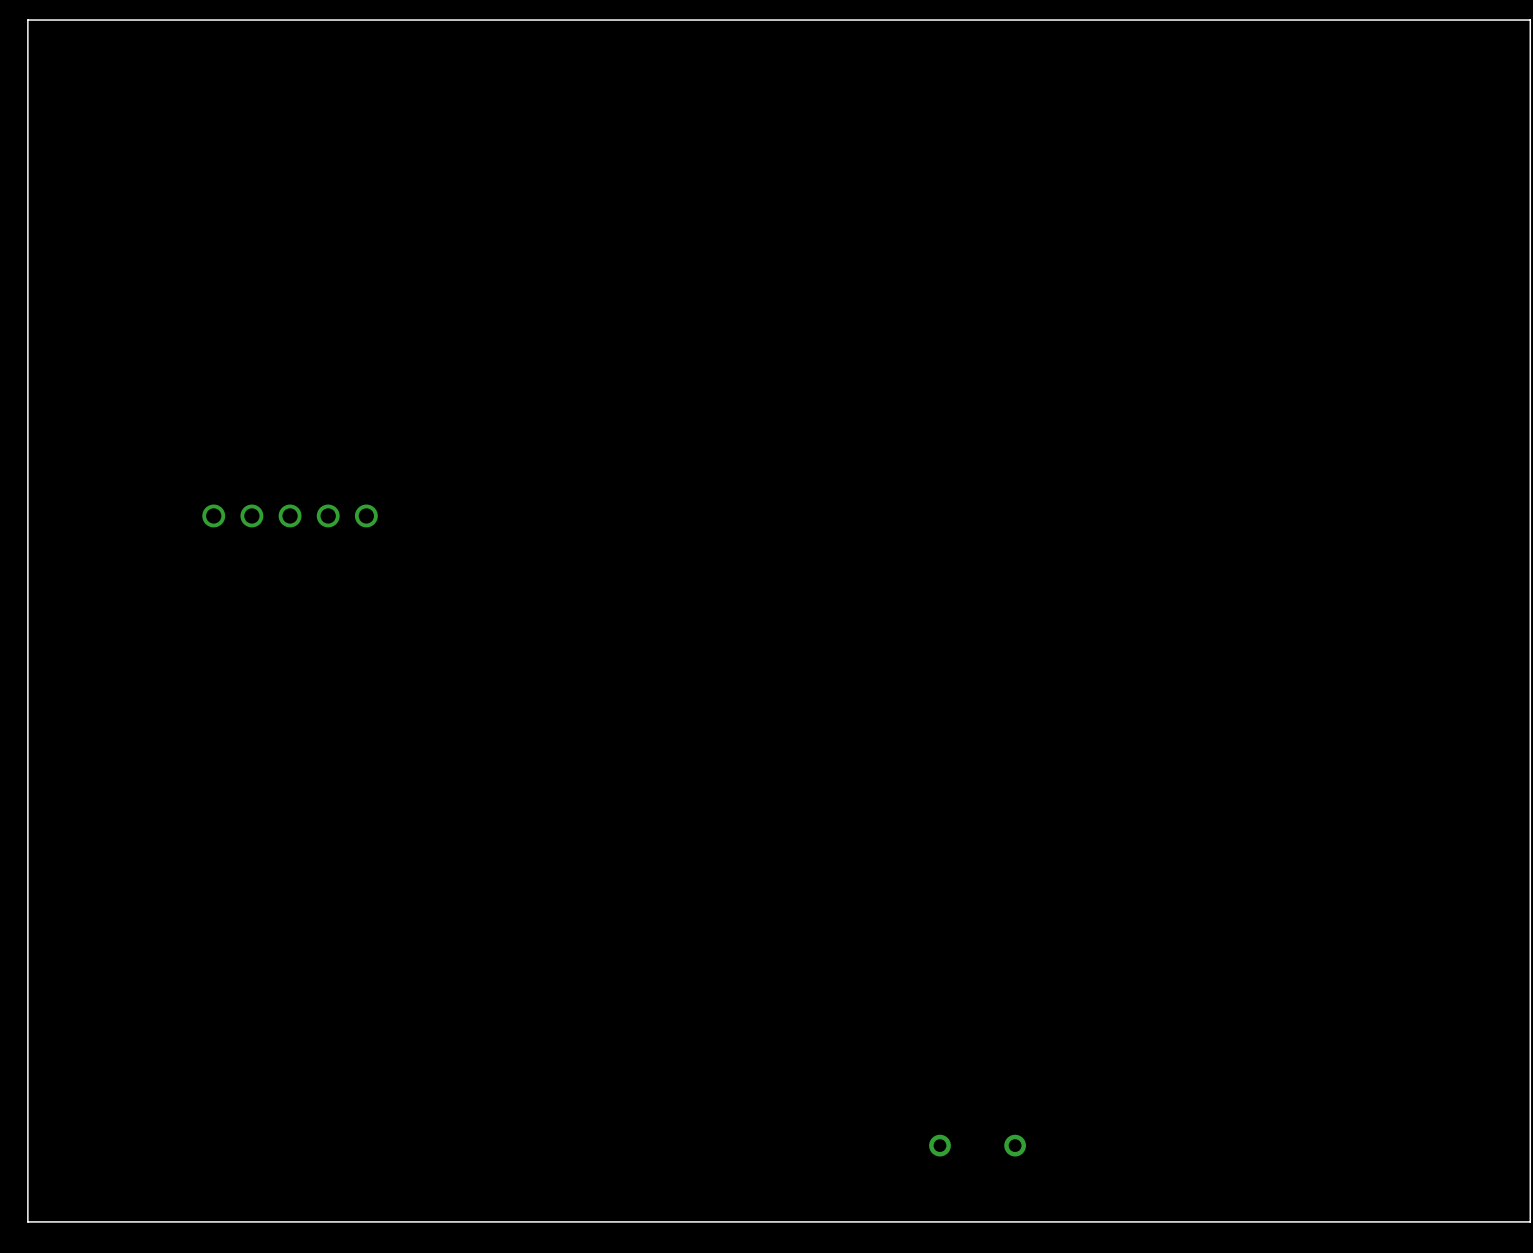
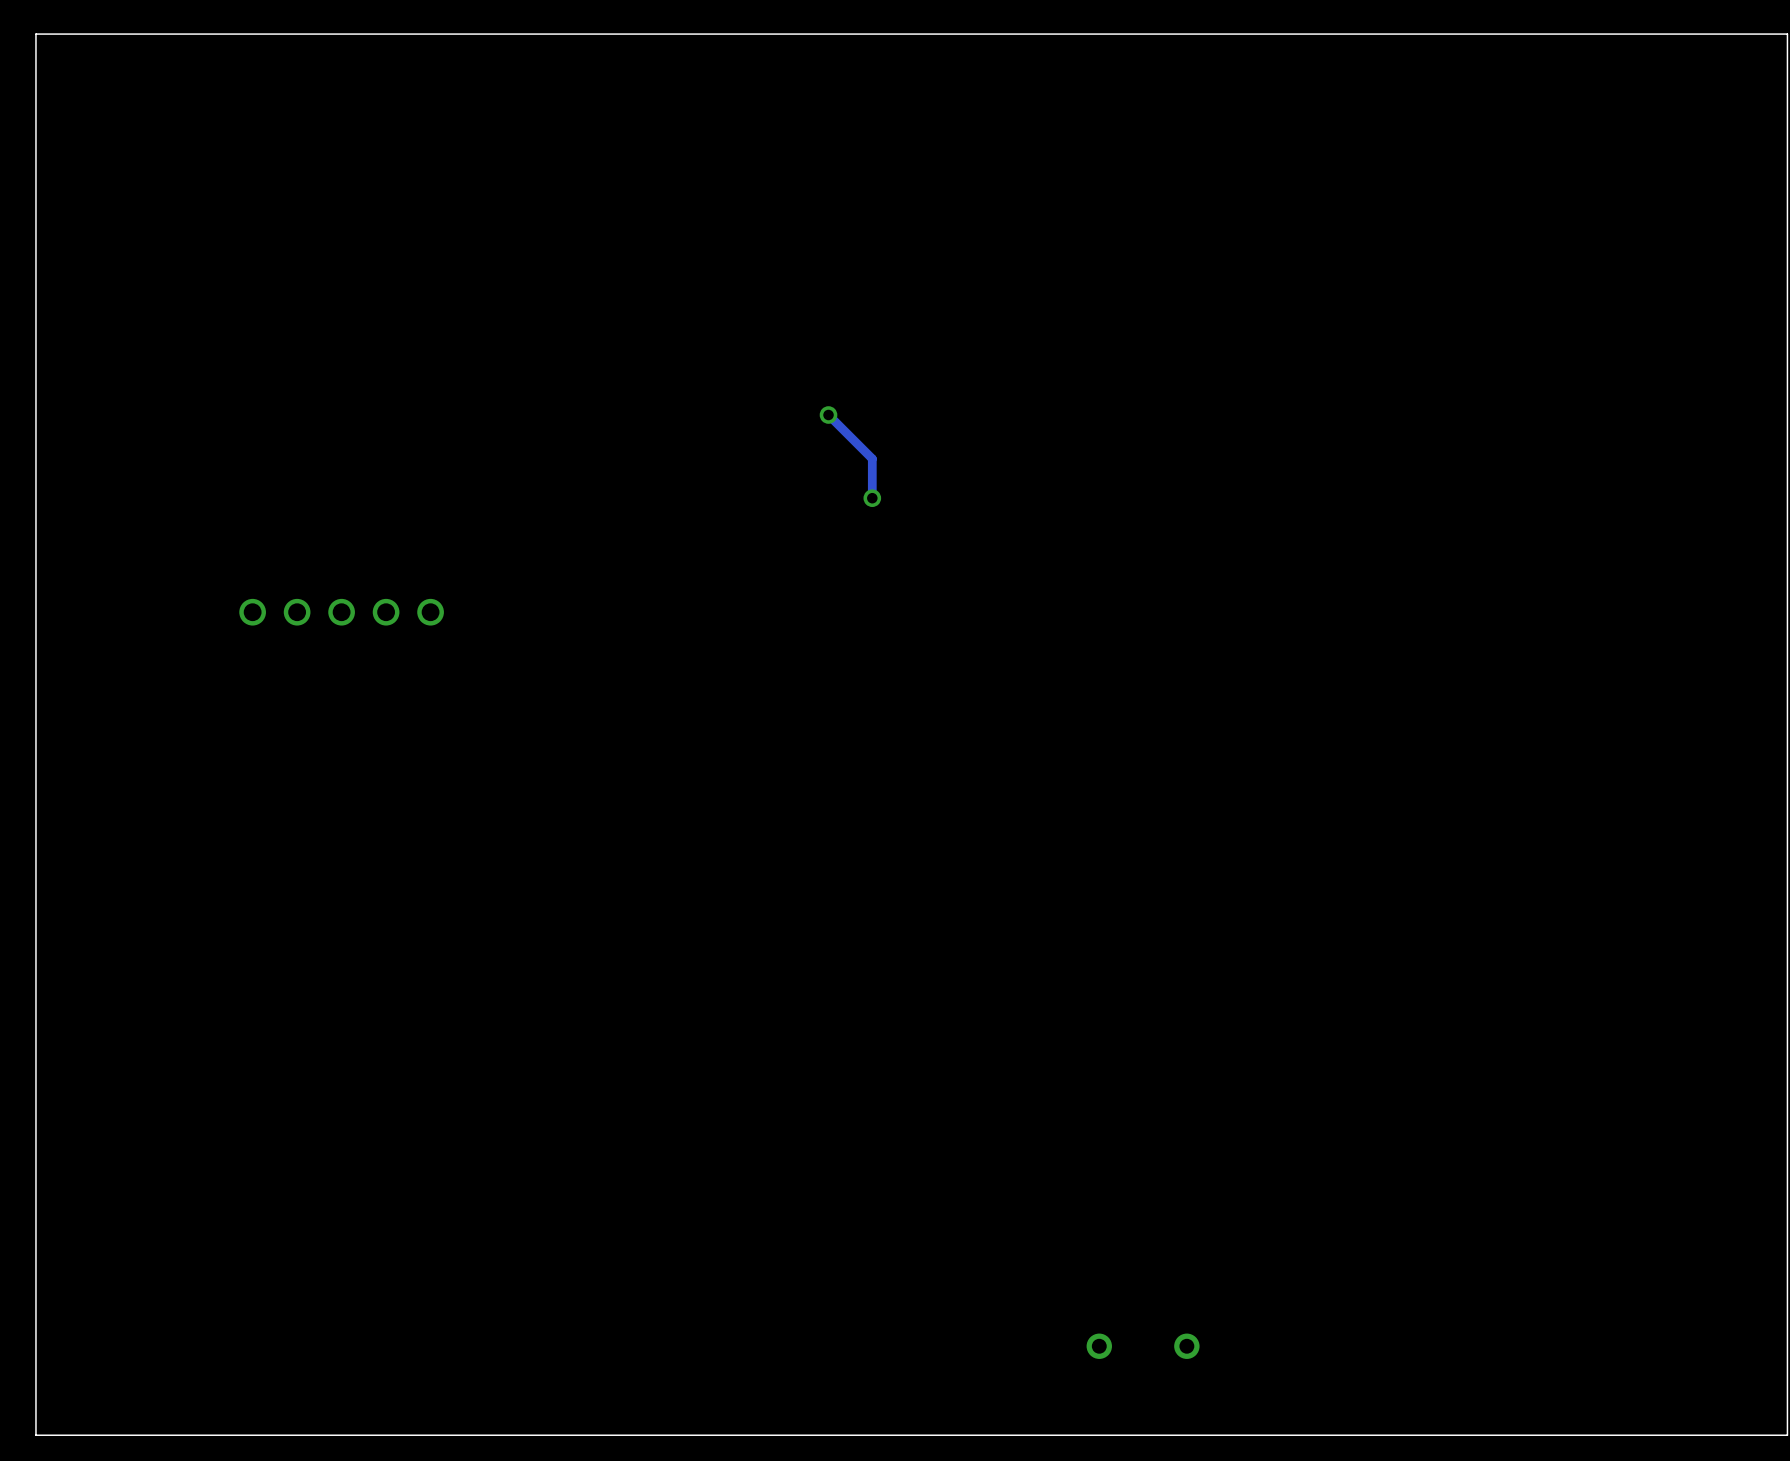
track: none -> (828, 415) (872, 458) (872, 498)
via: none -> (828, 415)
via: none -> (872, 498)

